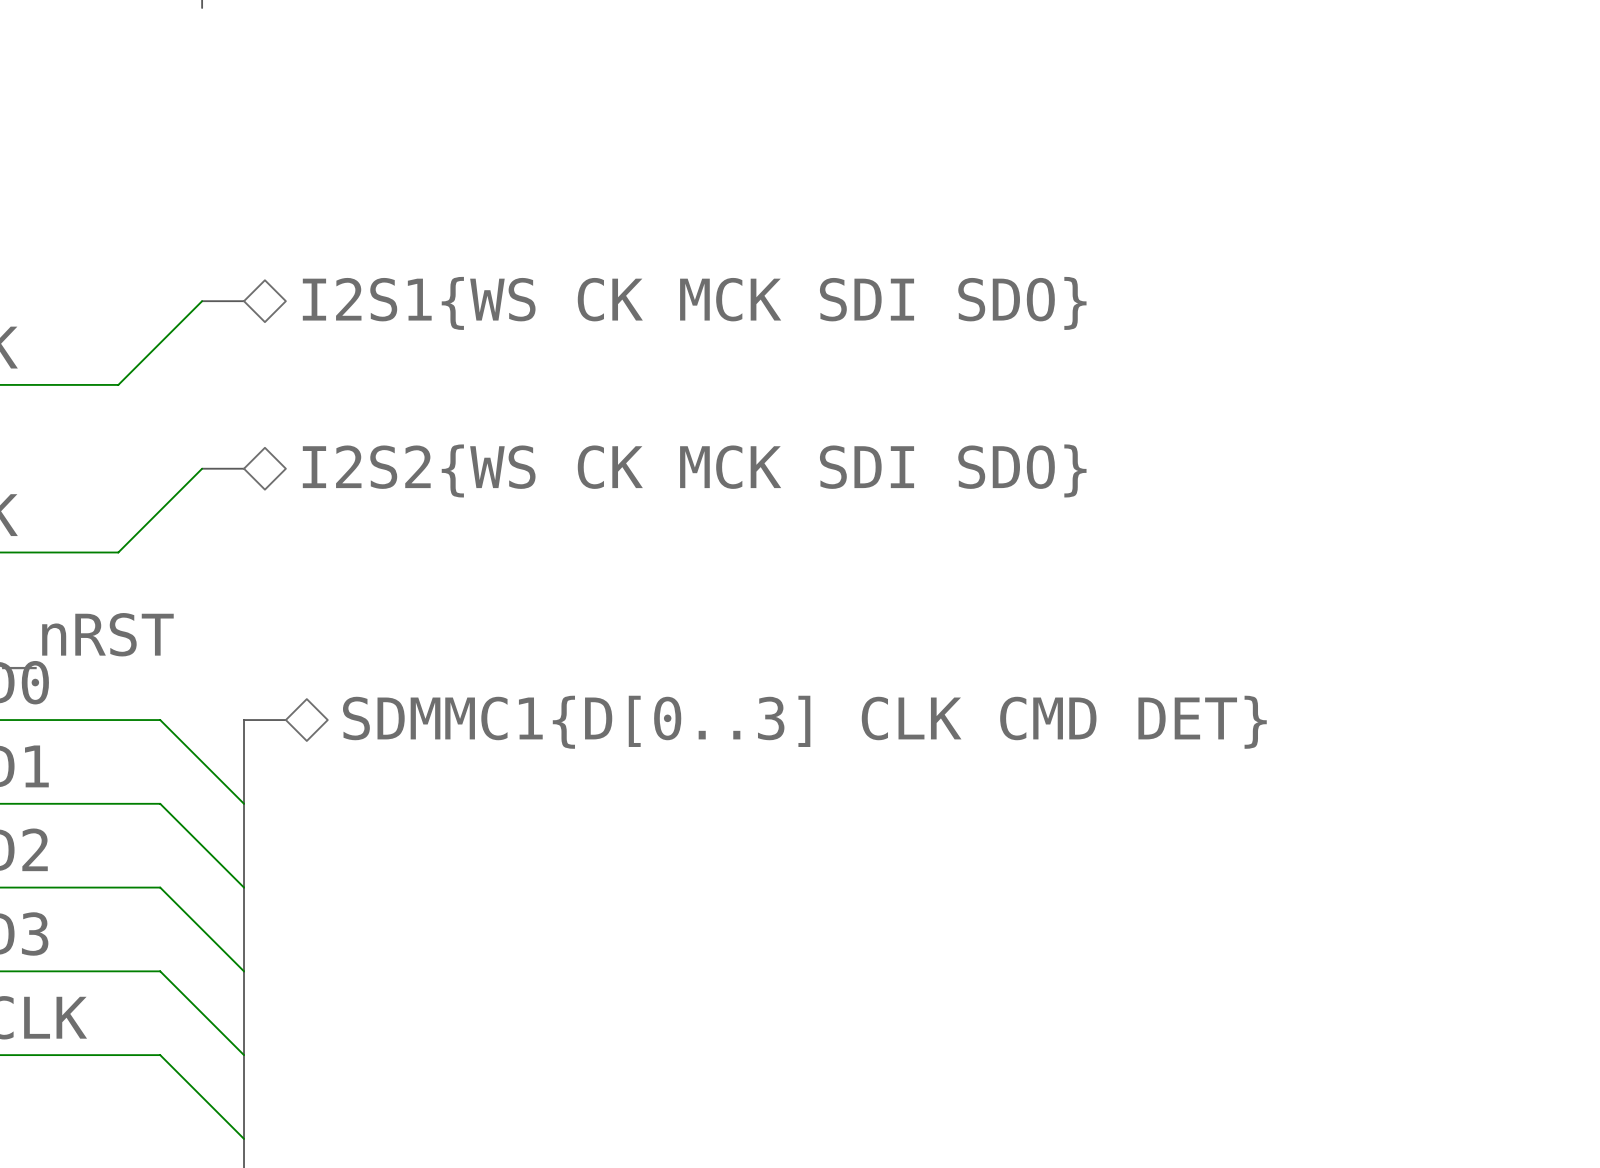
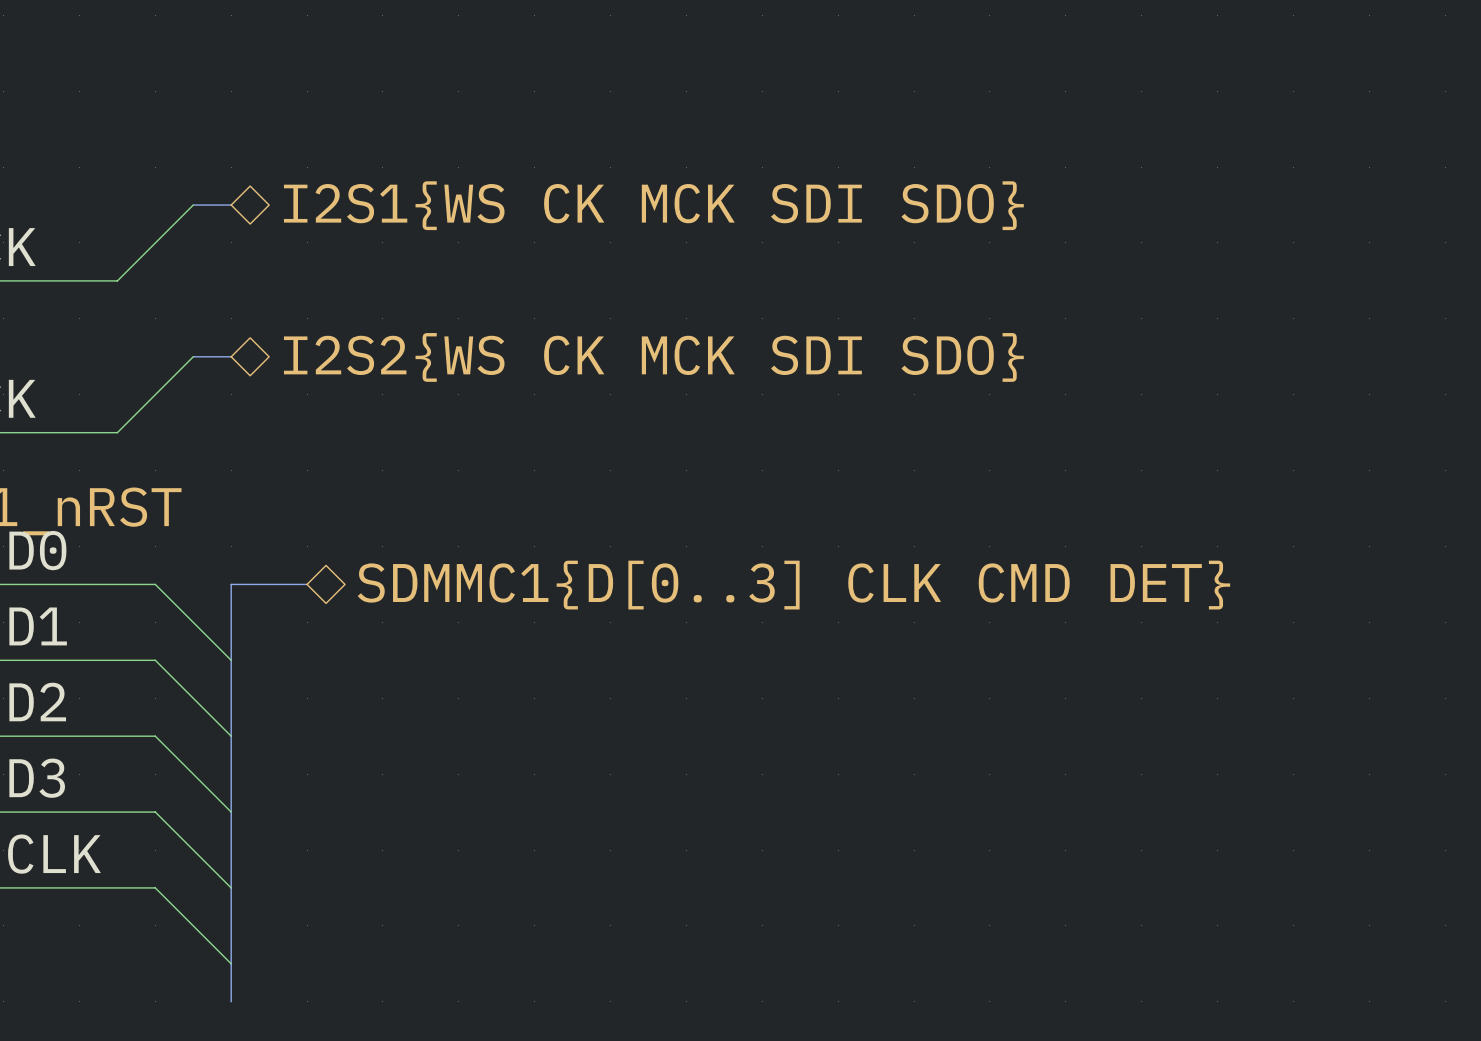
bus: none -> (269, 584) (307, 584)
hierarchical label position: SDMMC1{D[0..3] CLK CMD DET} (804, 722) -> SDMMC1{D[0..3] CLK CMD DET} (793, 585)

